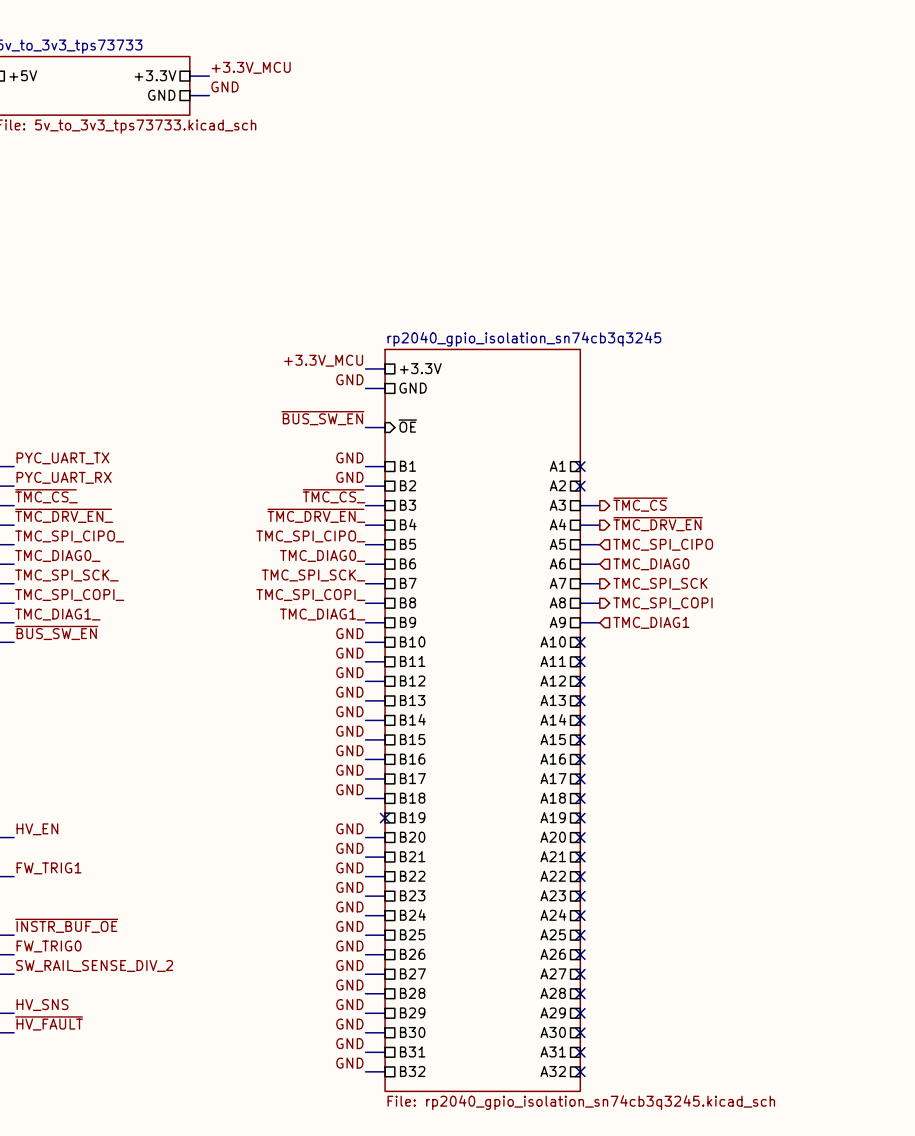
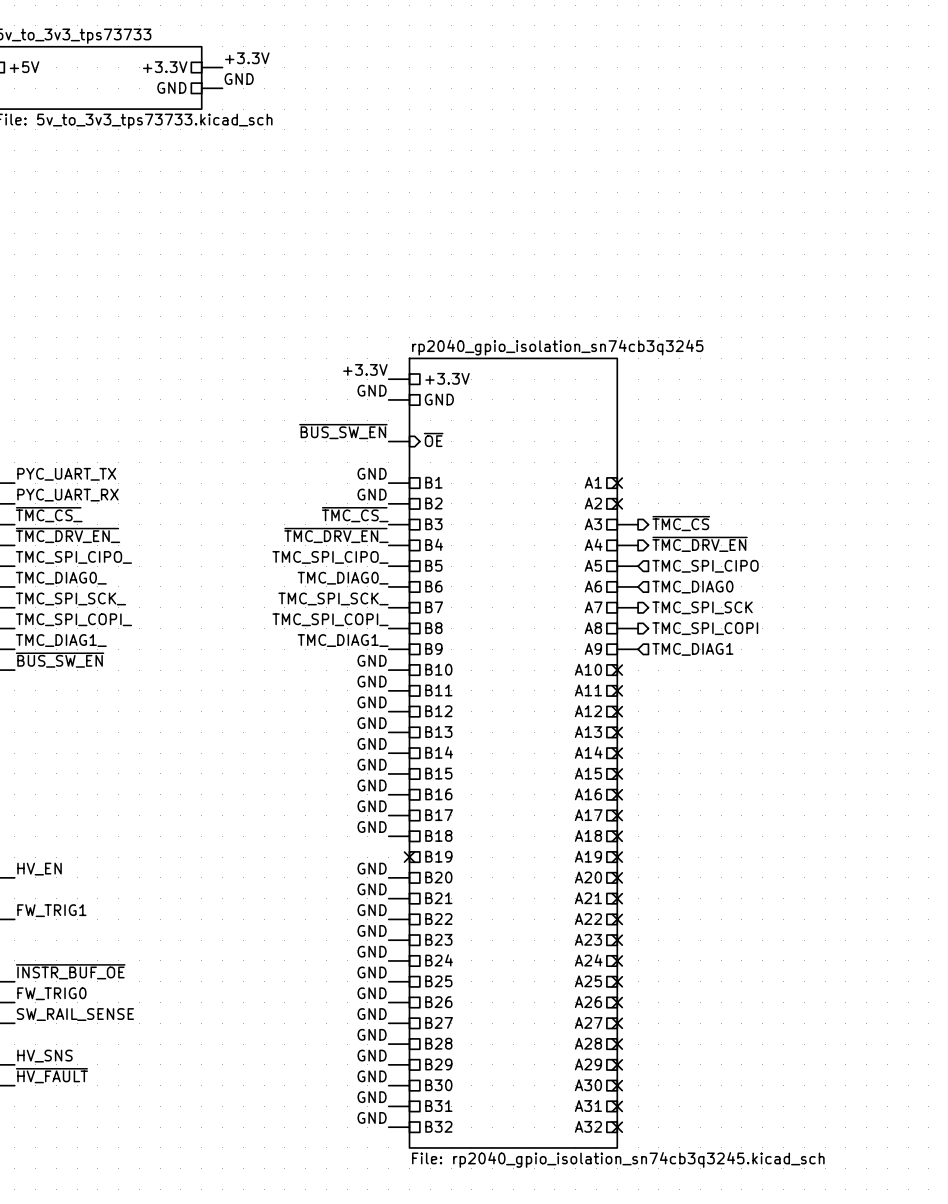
label: +3.3V_MCU (251, 67) -> +3.3V (247, 58)
label: +3.3V_MCU (323, 360) -> +3.3V (365, 369)
label: SW_RAIL_SENSE_DIV_2 (94, 965) -> SW_RAIL_SENSE (75, 1014)

